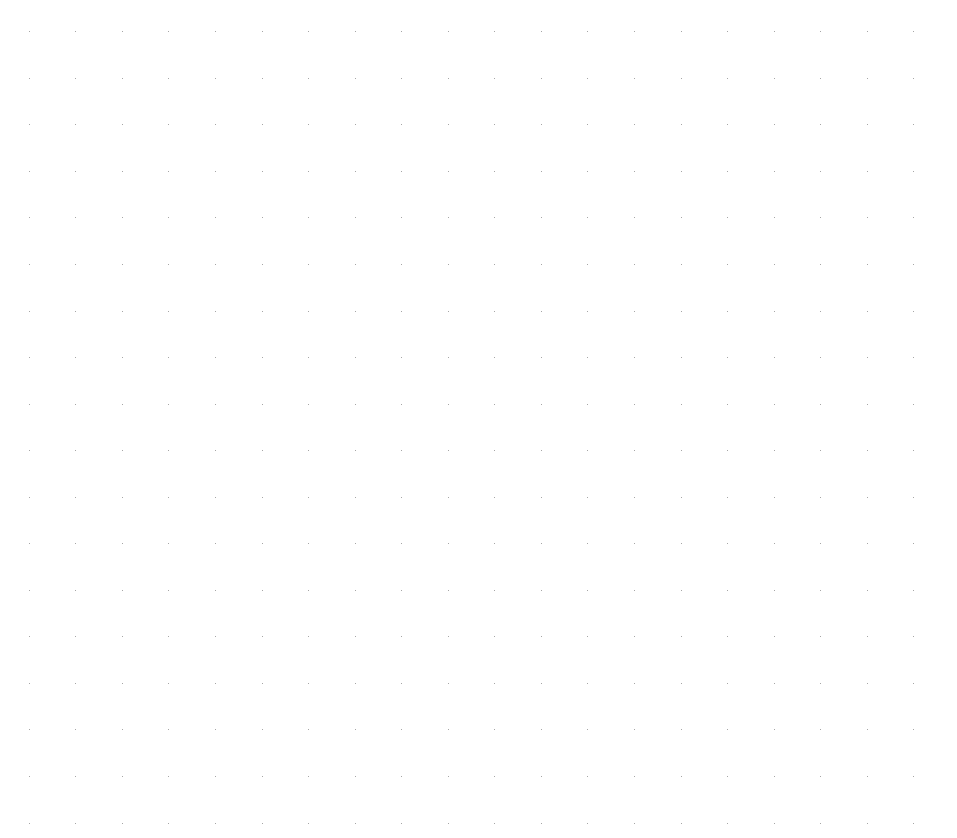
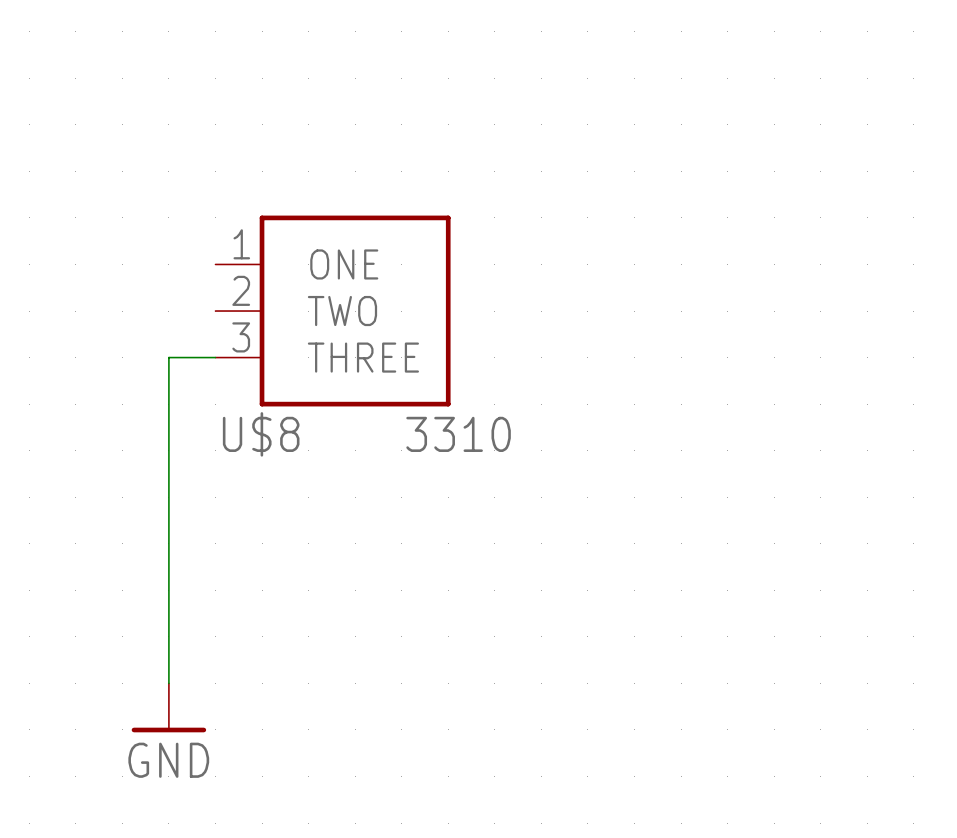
U$8: none -> (333, 311)
wire: none -> (215, 357) (168, 357) (168, 683)
power symbol: none -> GND (168, 707)

